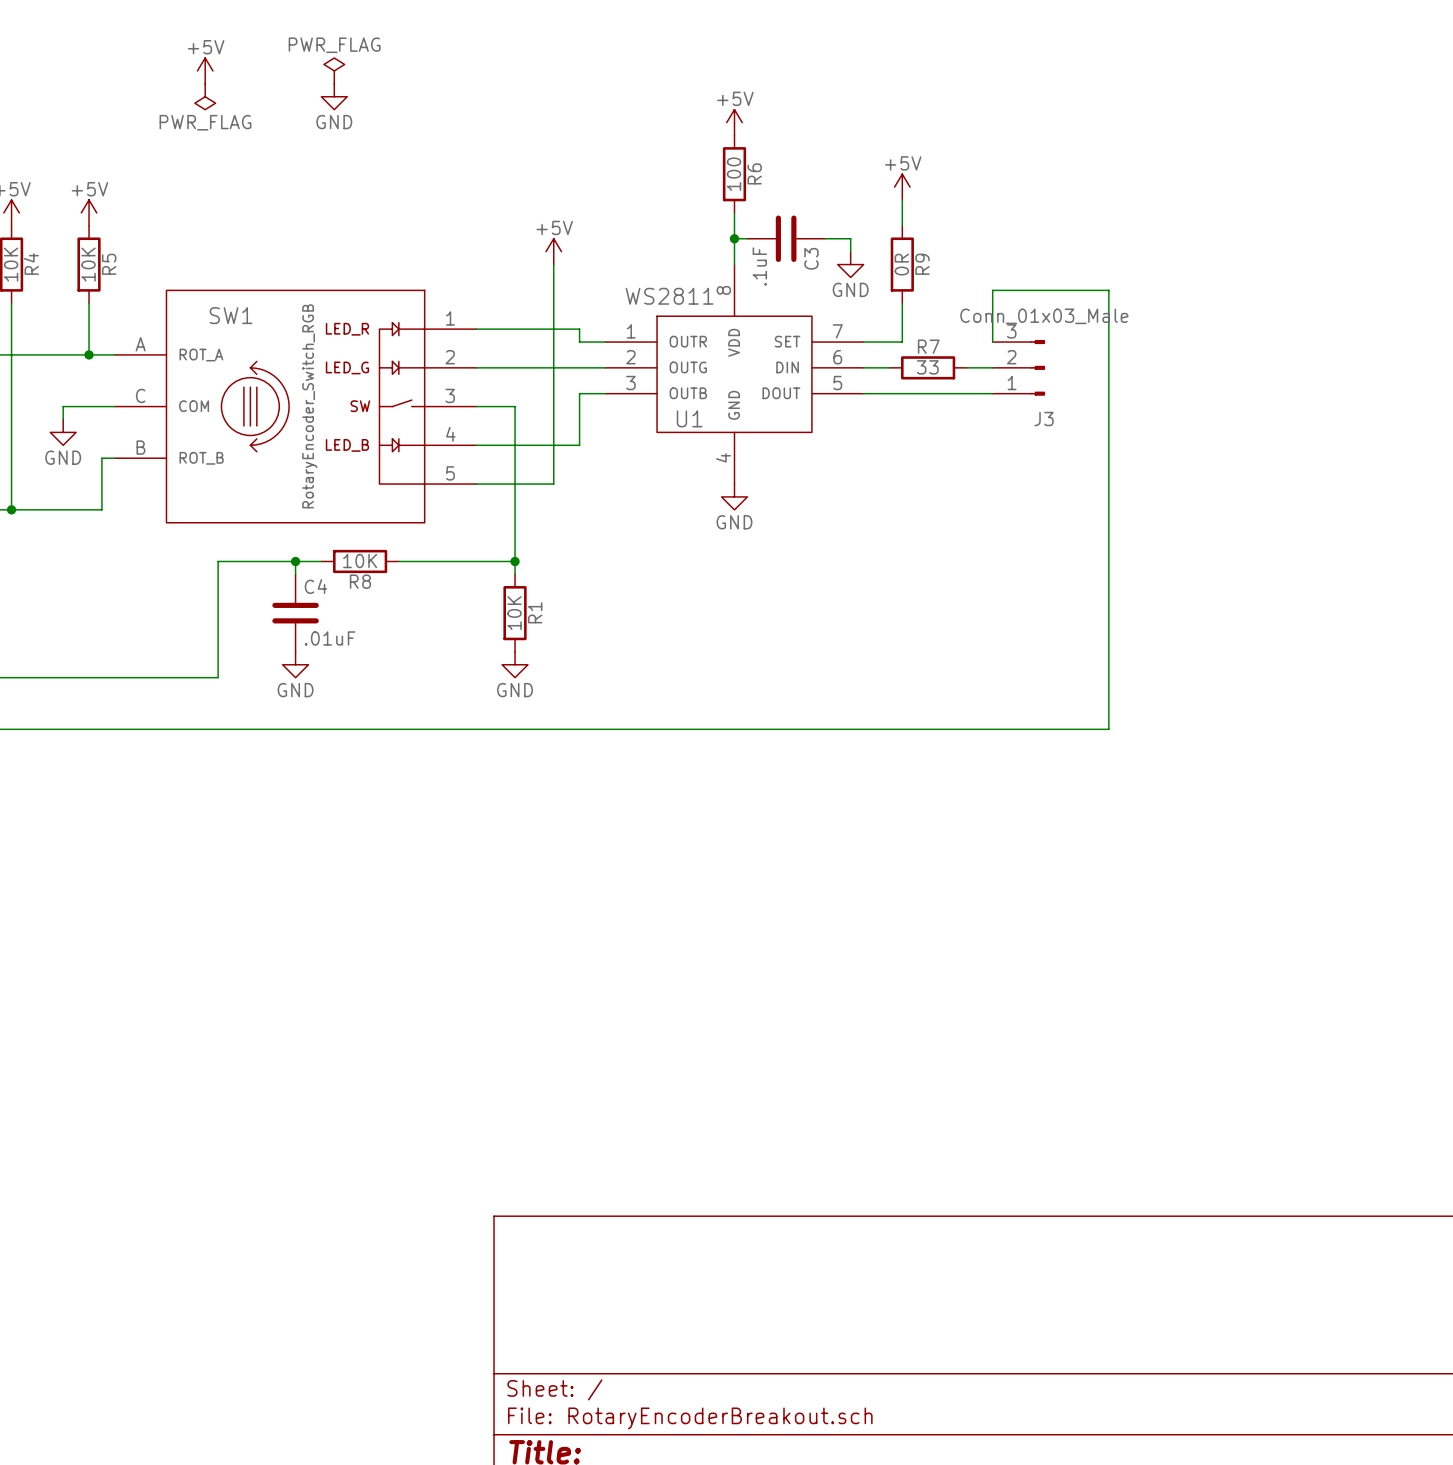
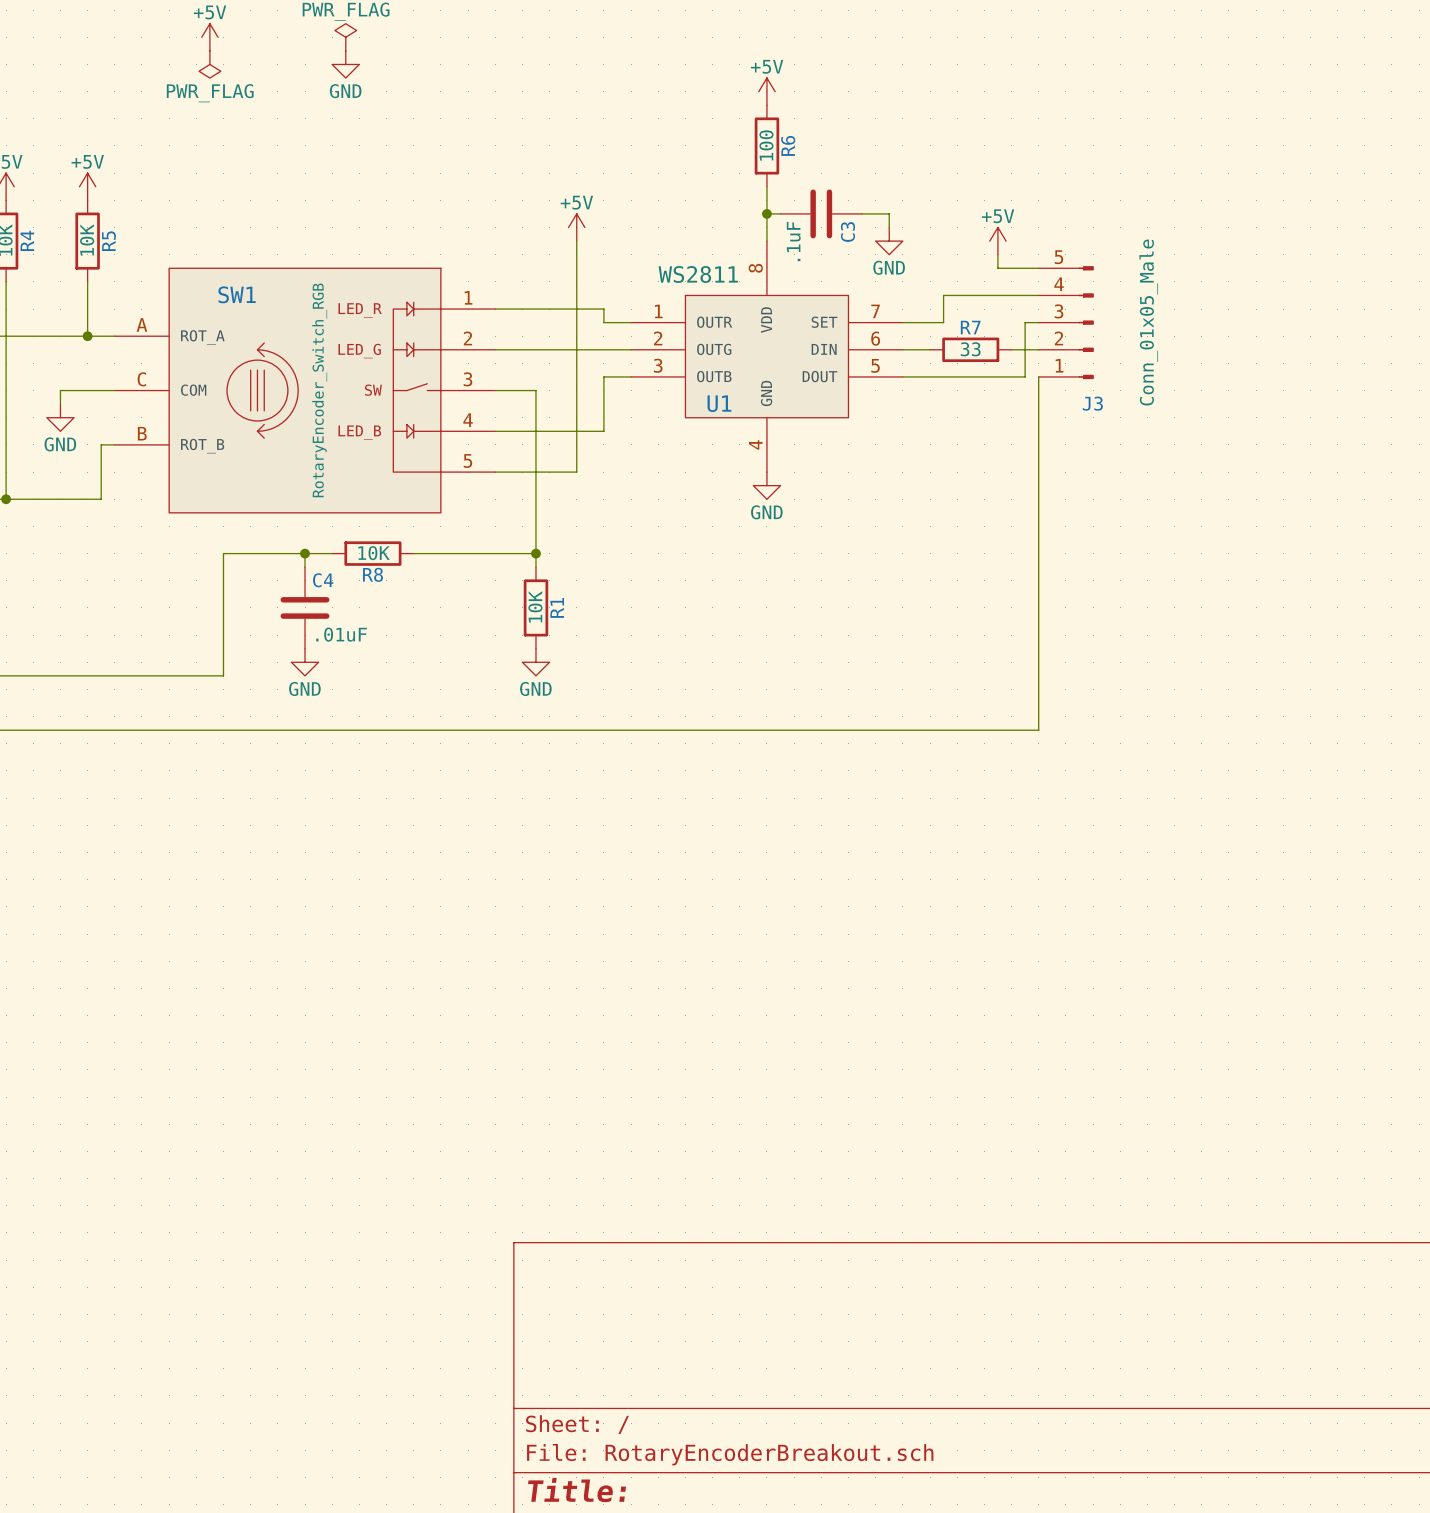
power symbol position: +5V (902, 187) -> +5V (997, 241)
wire: (902, 200) (902, 225) -> none
R9: 0R (902, 264) -> none
wire: none -> (997, 254) (997, 268) (1038, 268)
wire: (902, 303) (902, 316) -> (1038, 295) (943, 295)
J3 value: Conn_01x03_Male (1044, 316) -> Conn_01x05_Male (1148, 322)
J3 symbol: [992, 339, 1046, 396] -> [1038, 266, 1094, 380]
wire: (992, 342) (992, 290) (1108, 290) (1108, 729) (992, 729) -> (1038, 376) (1038, 730)
wire: (979, 393) (992, 393) -> (1025, 376) (1025, 322) (1038, 322)

